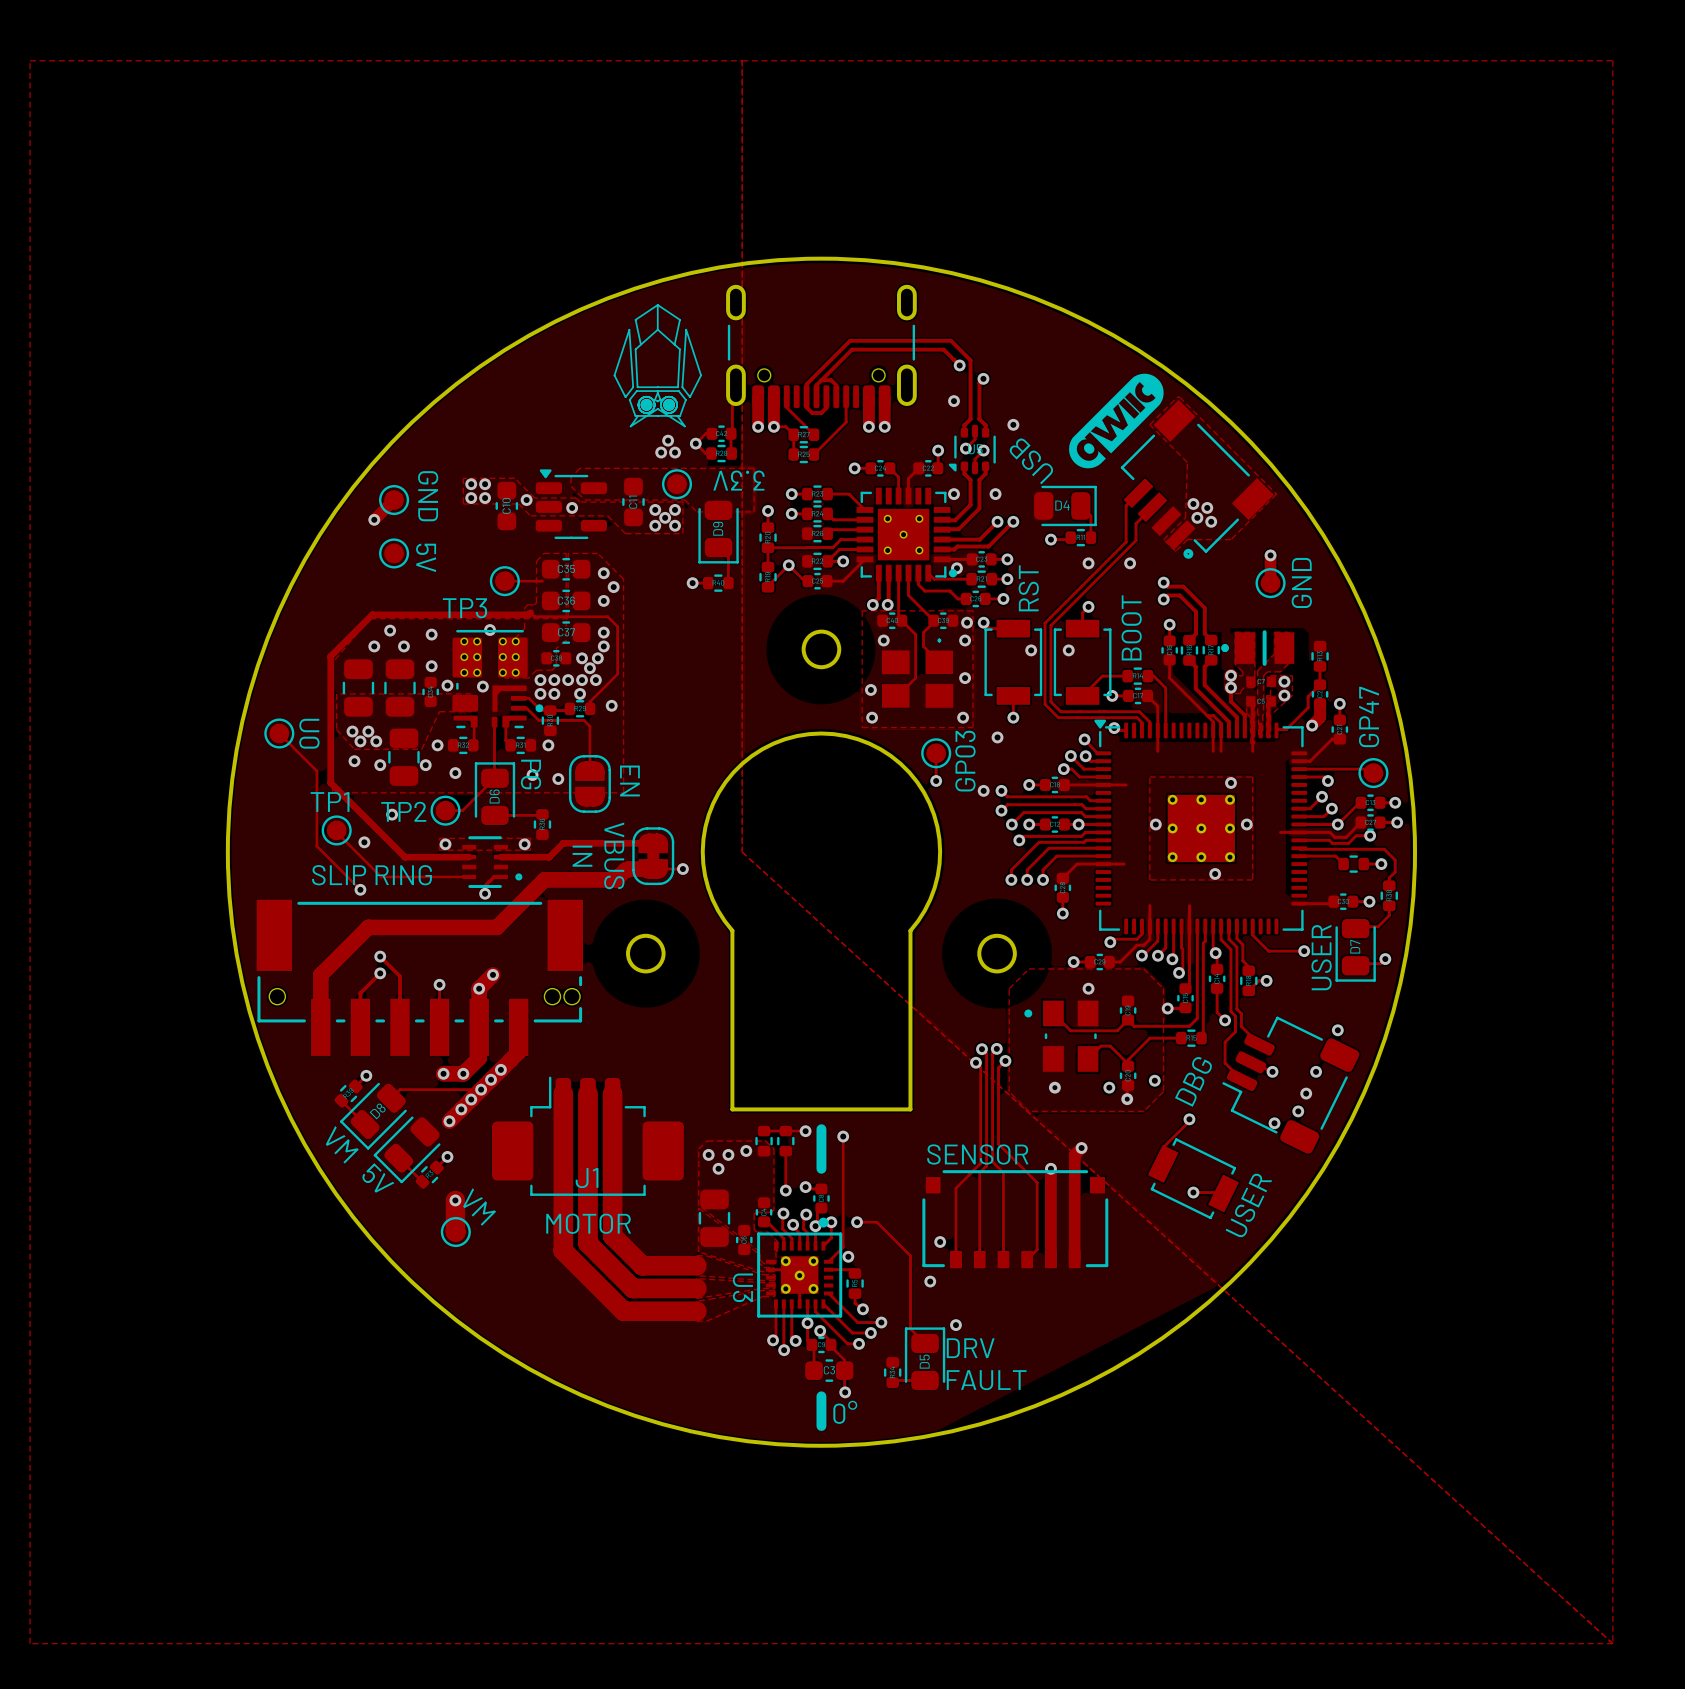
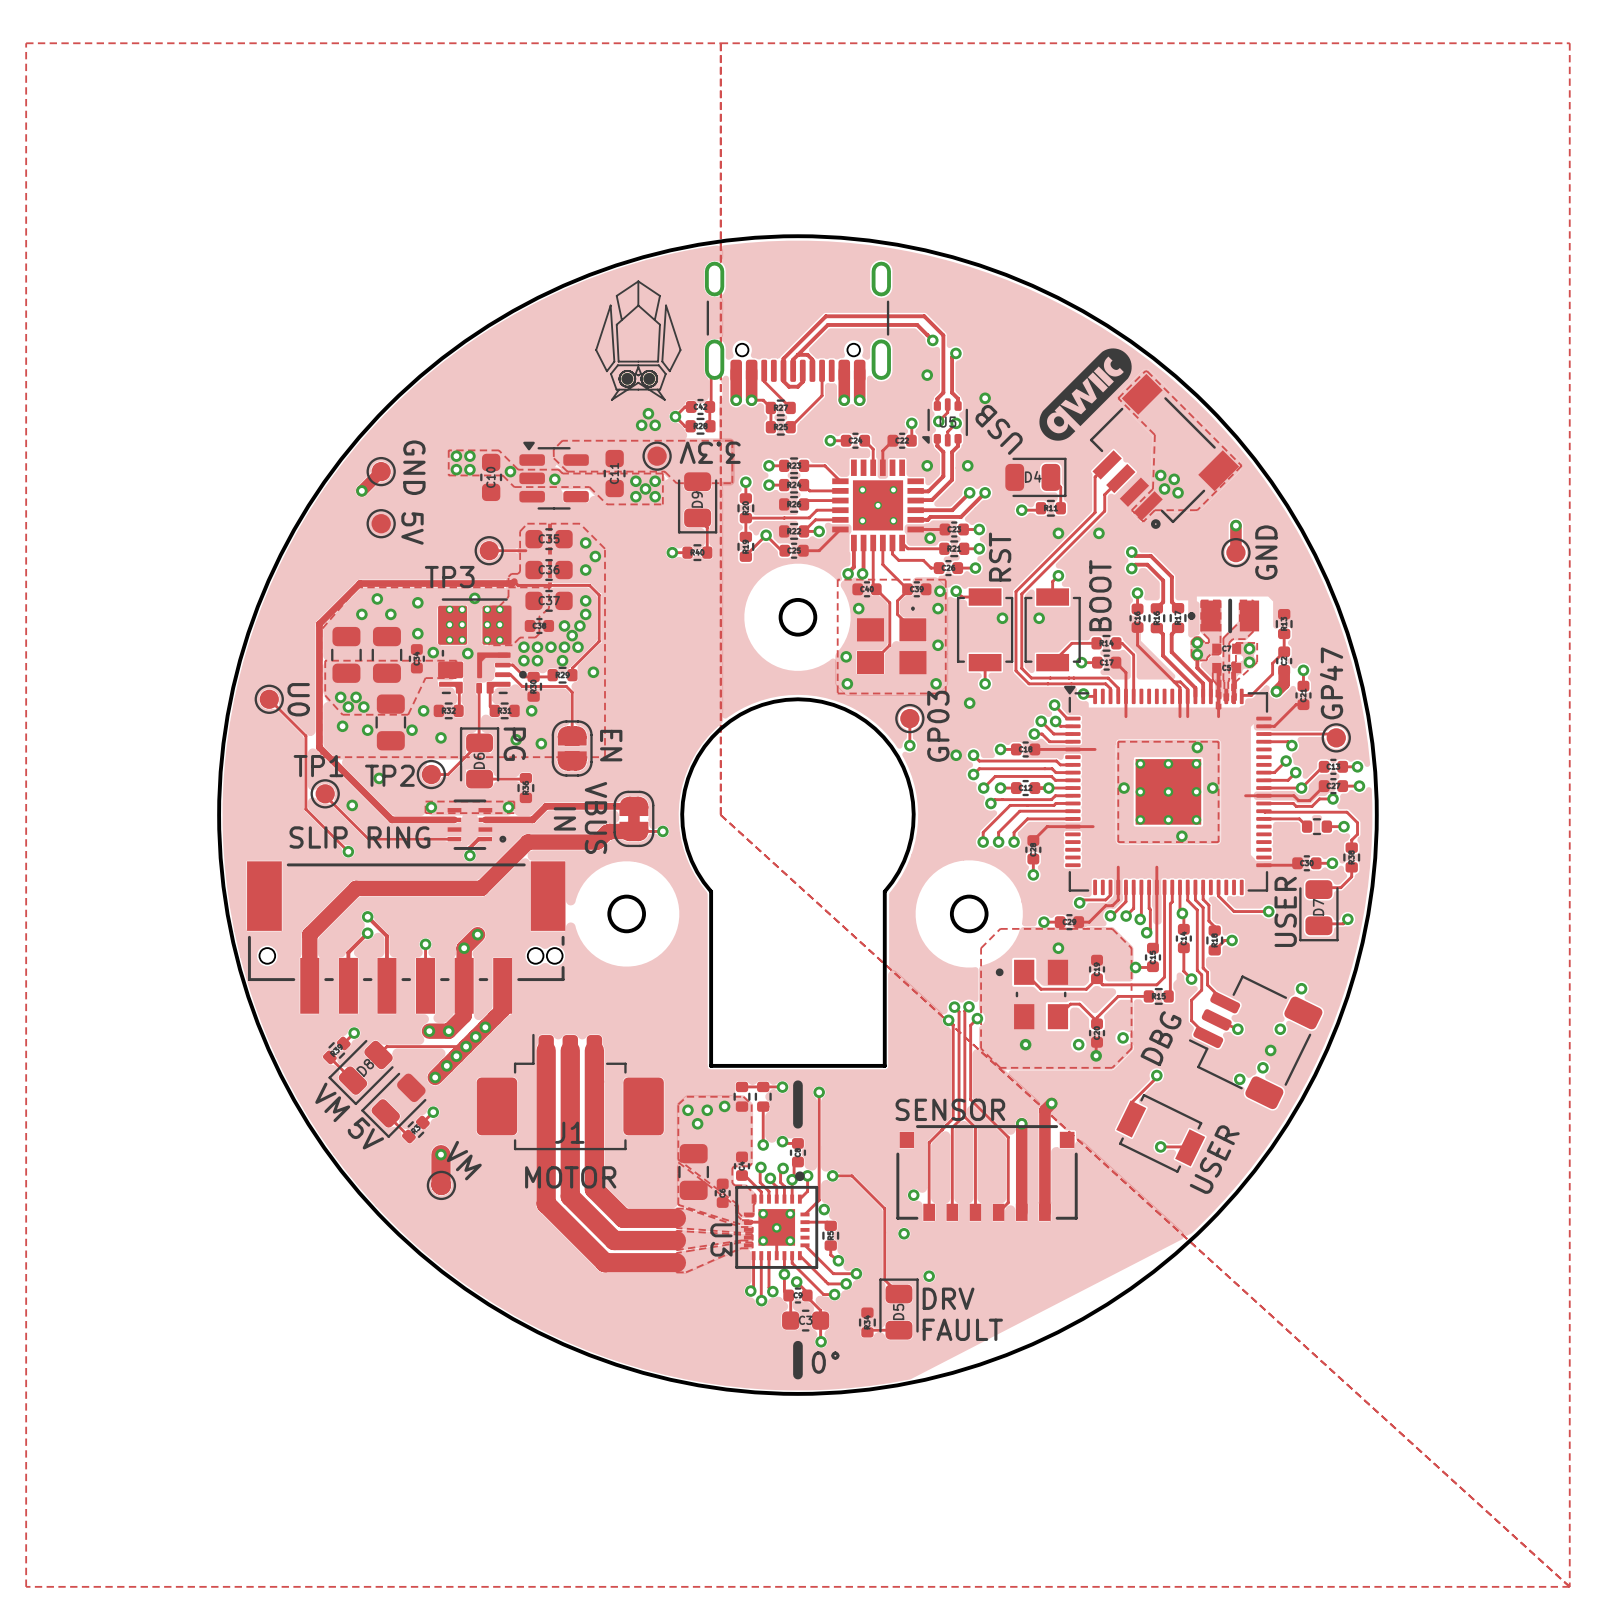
part footprint: [856, 487, 958, 582] -> [832, 459, 924, 552]

